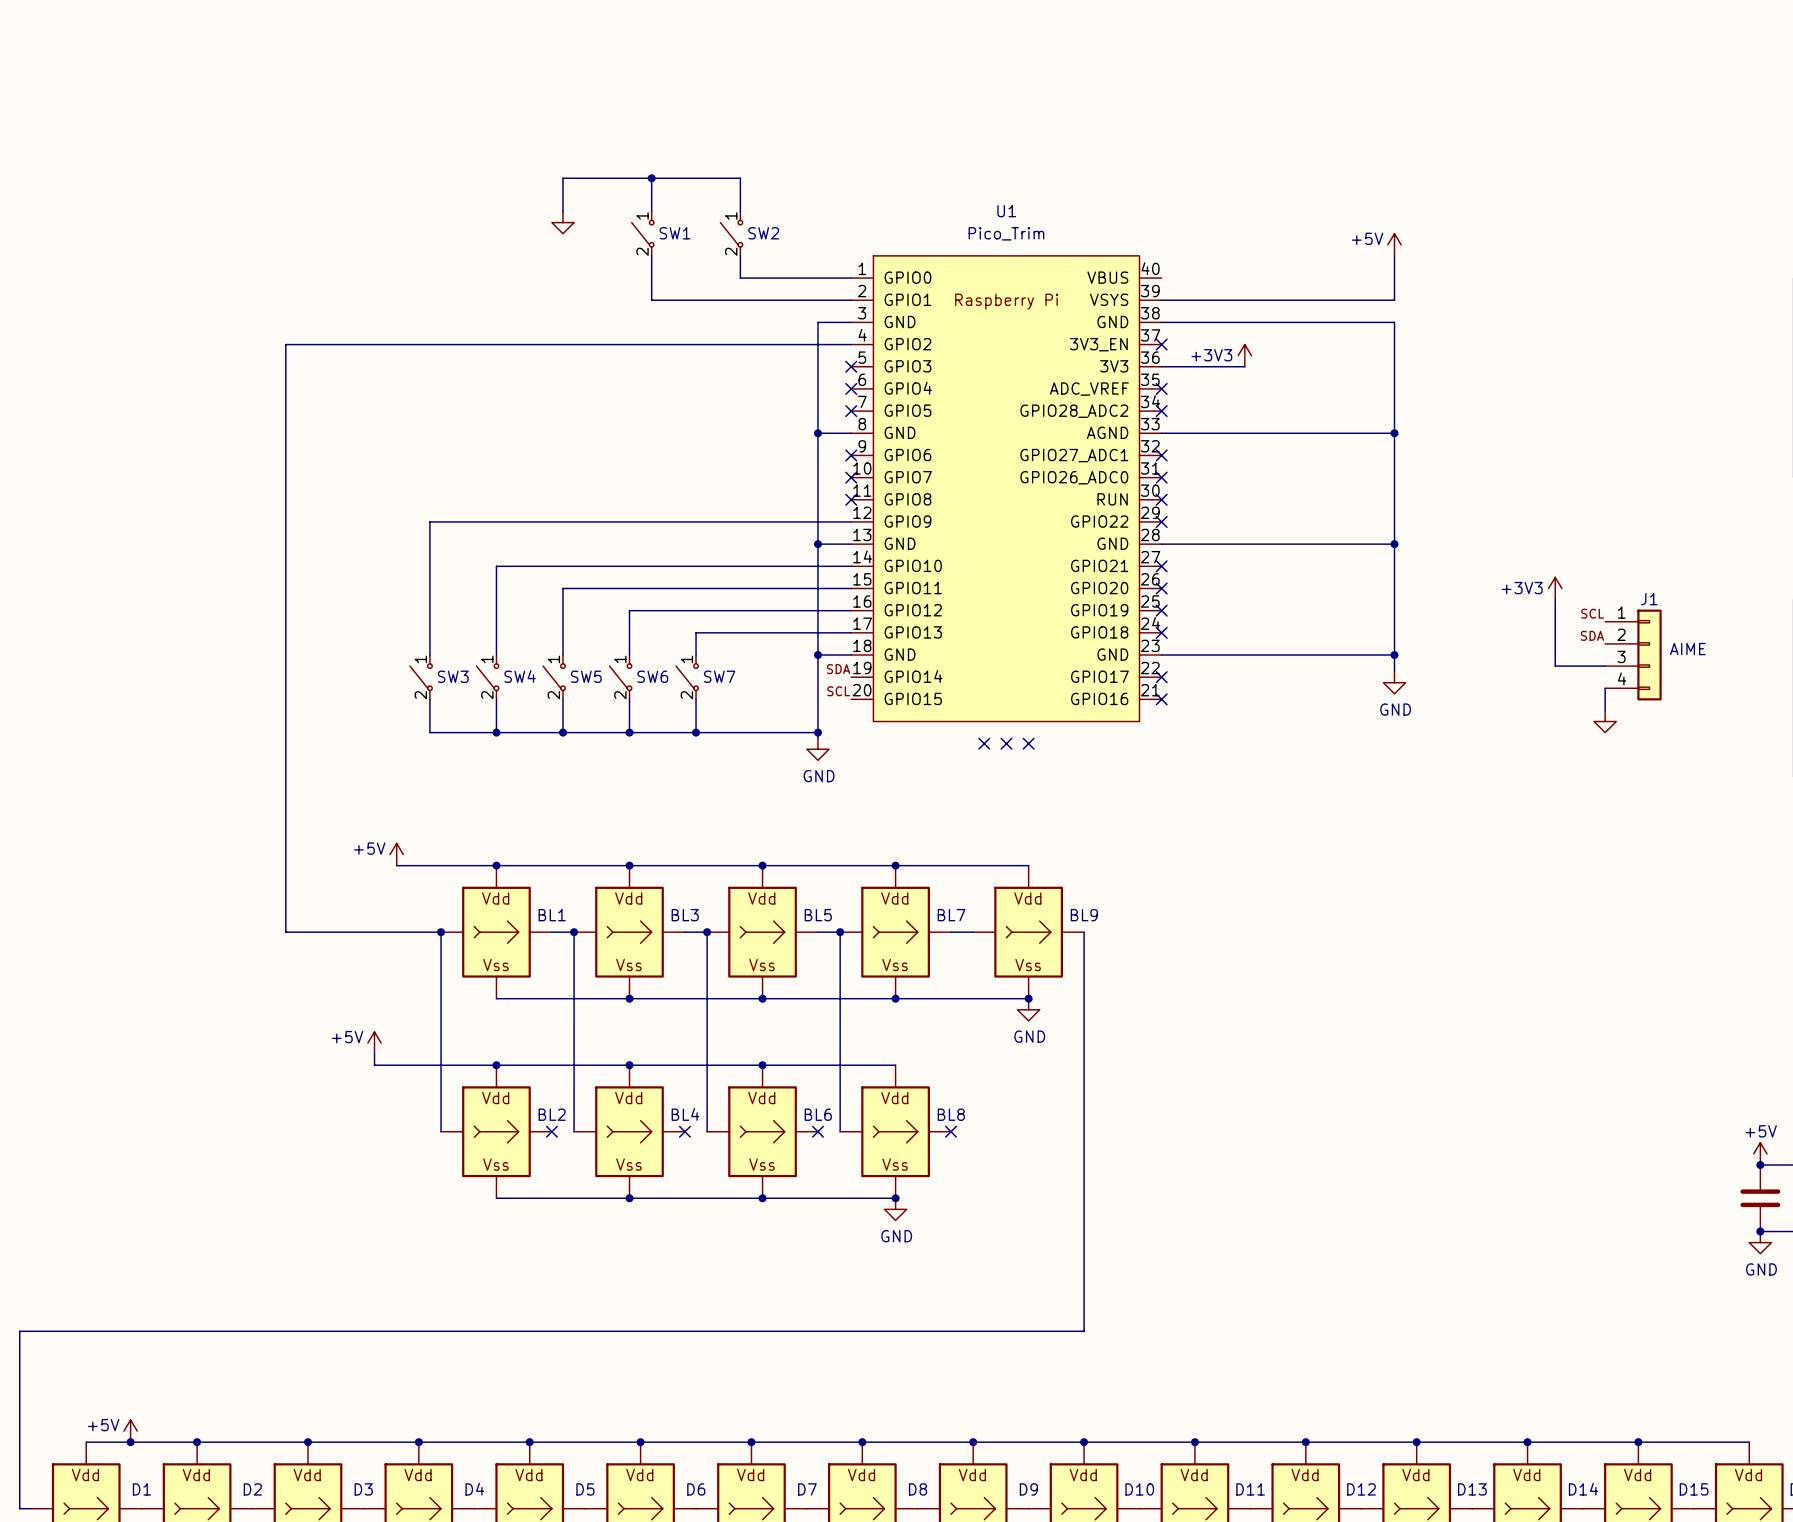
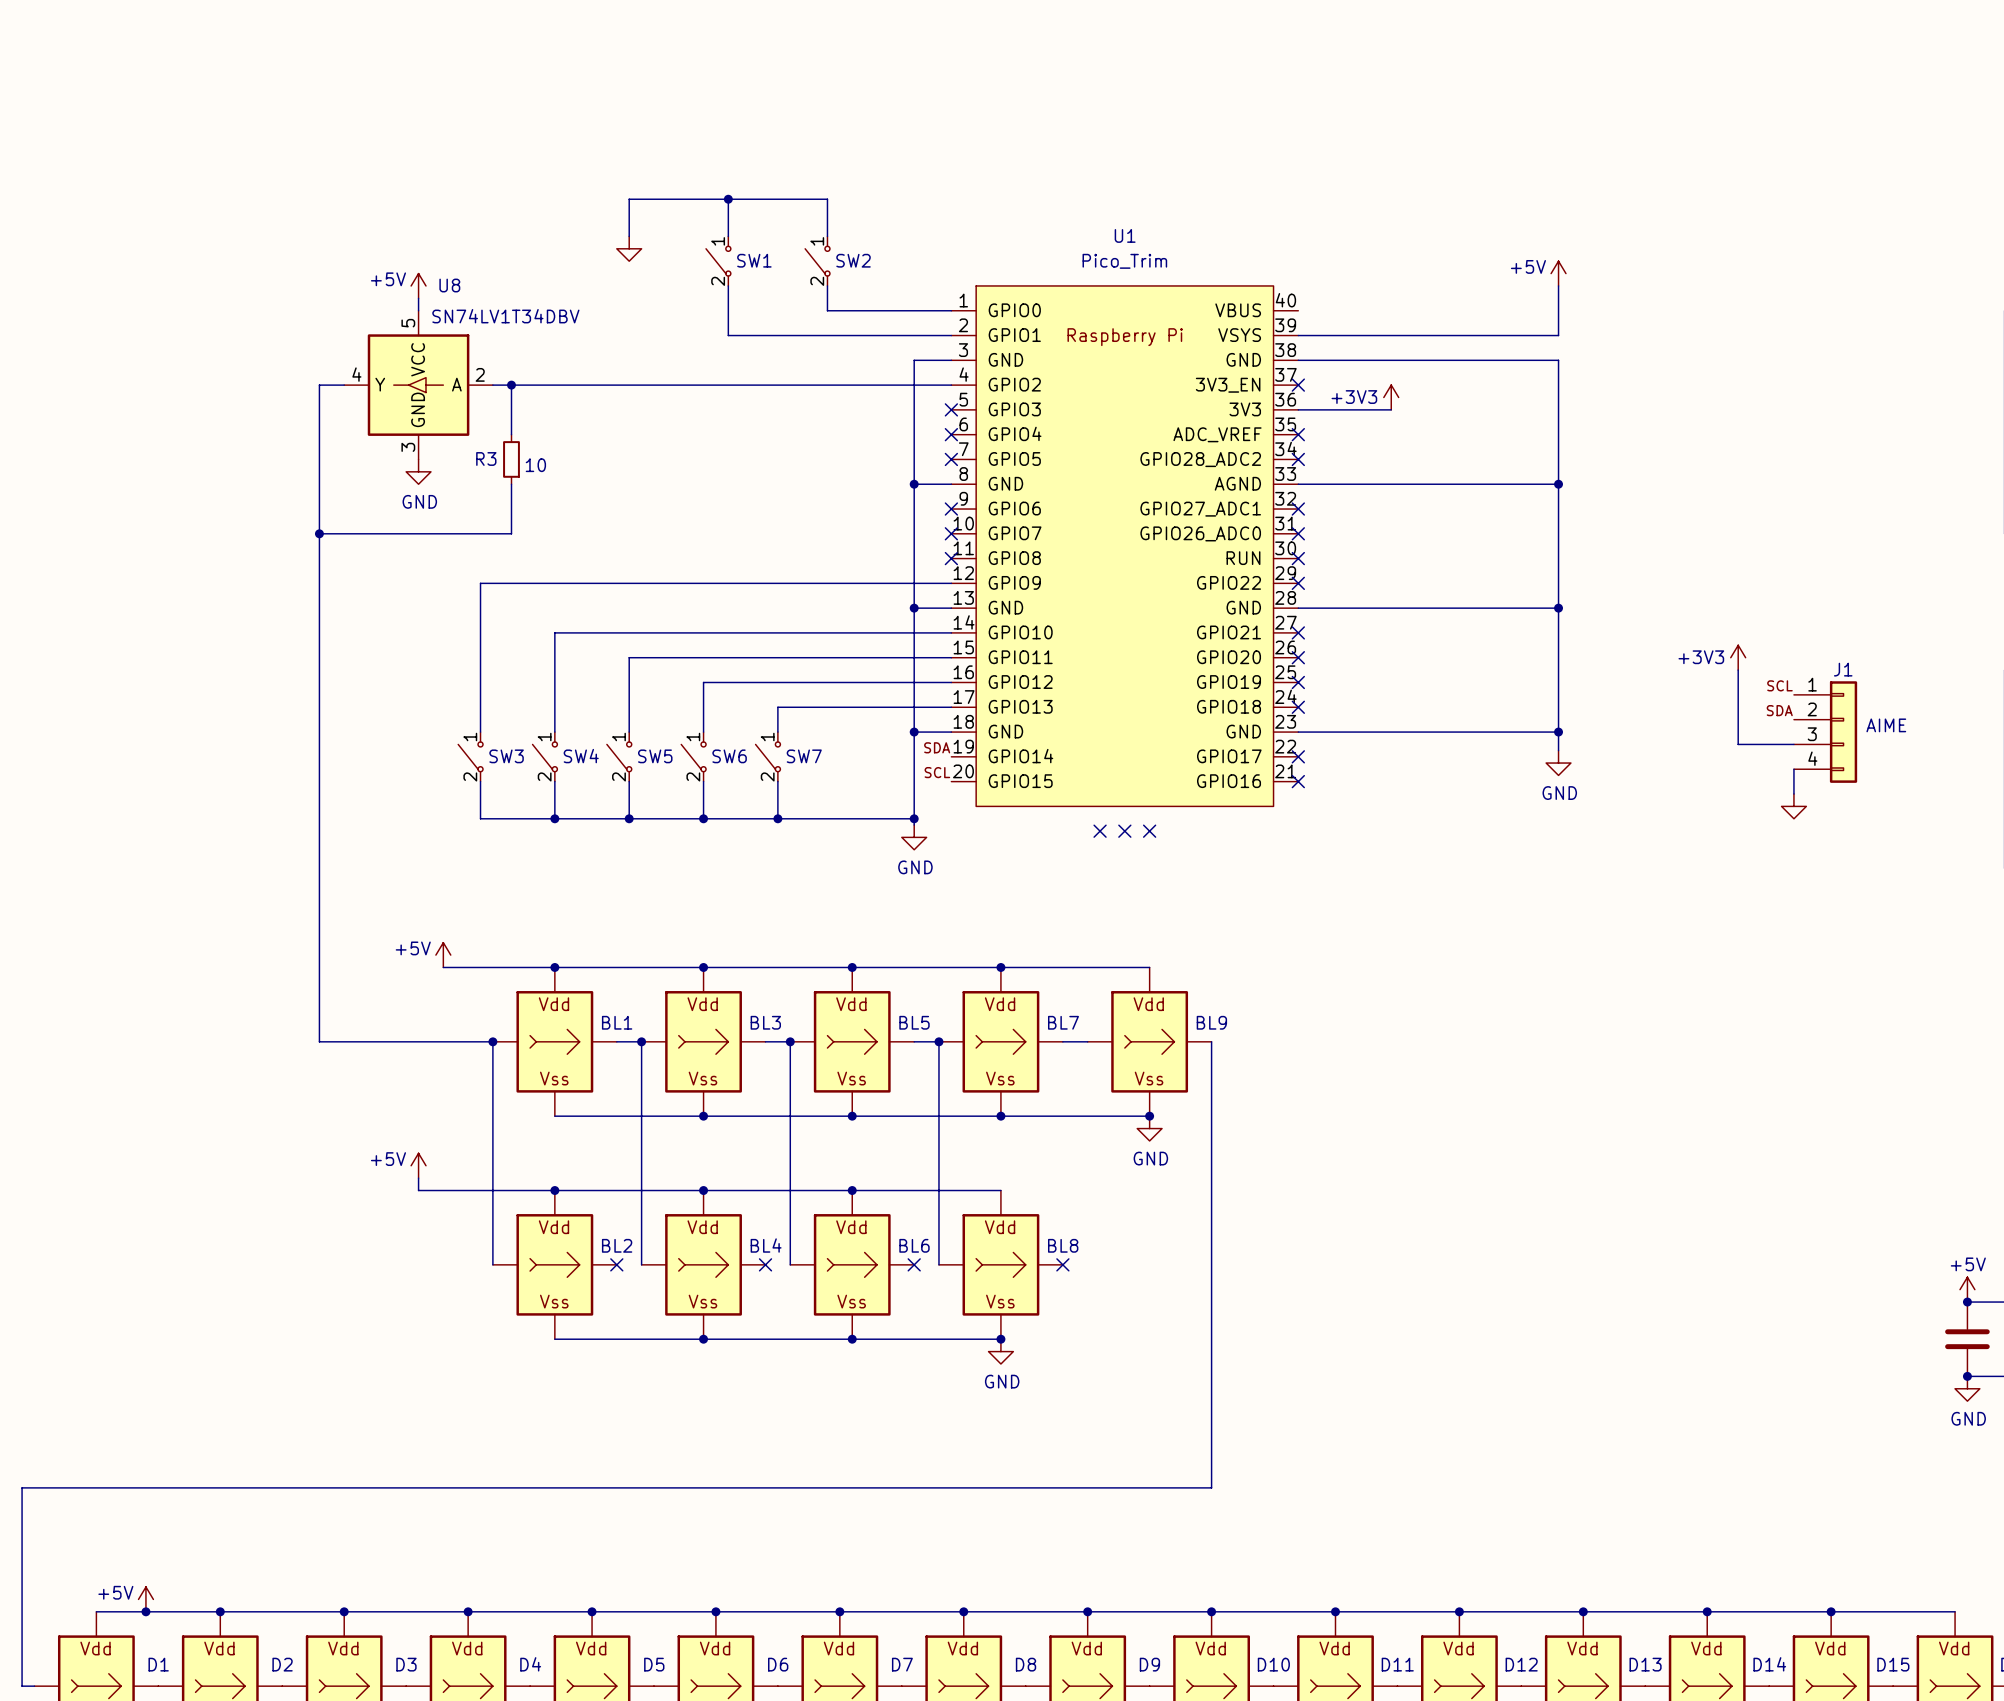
power symbol: none -> +5V (418, 285)
wire: none -> (418, 298) (418, 310)
U8: none -> SN74LV1T34DBV (418, 385)
wire: none -> (511, 385) (511, 434)
junction: none -> (511, 385)
R3: none -> 10 (511, 459)
power symbol: none -> GND (418, 471)
wire: none -> (511, 484) (511, 533) (319, 533)
junction: none -> (319, 533)

